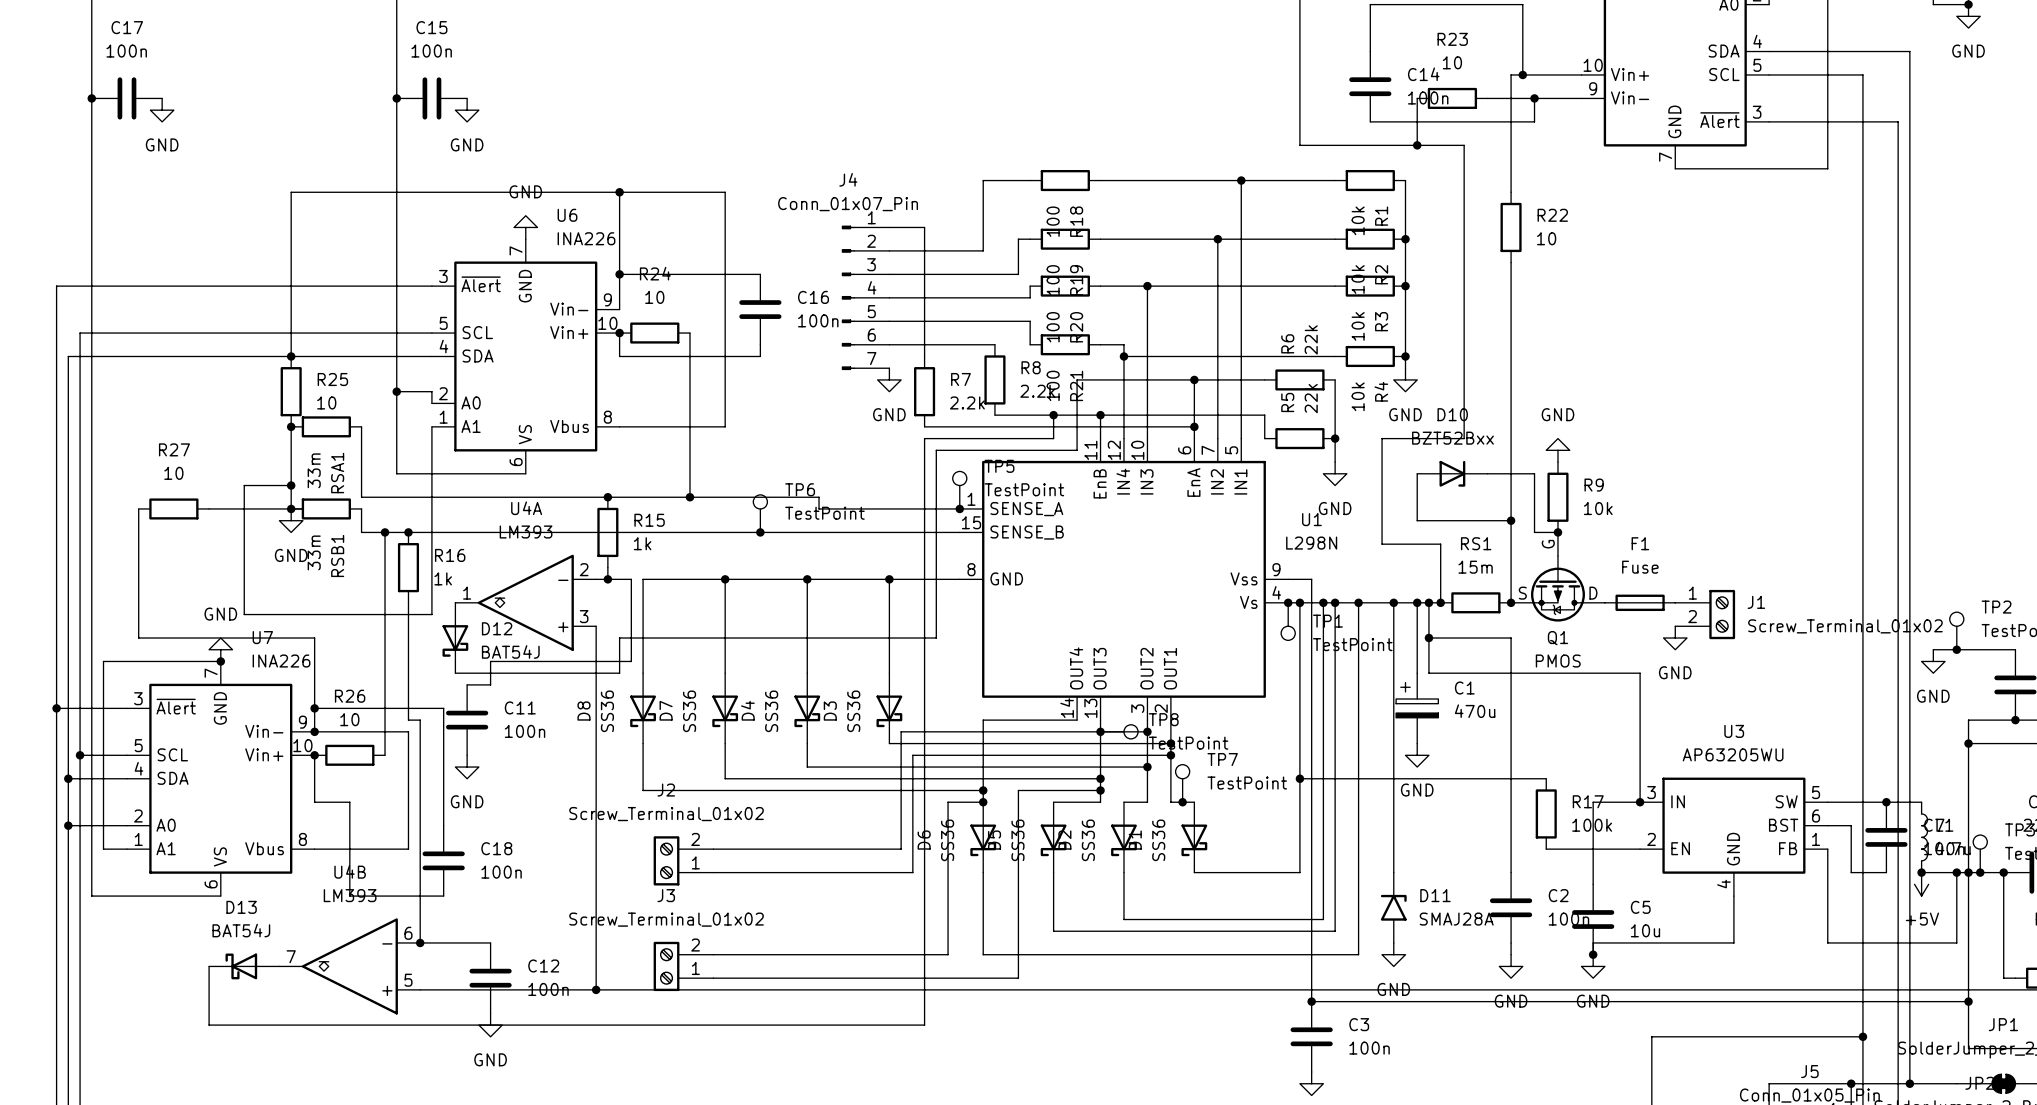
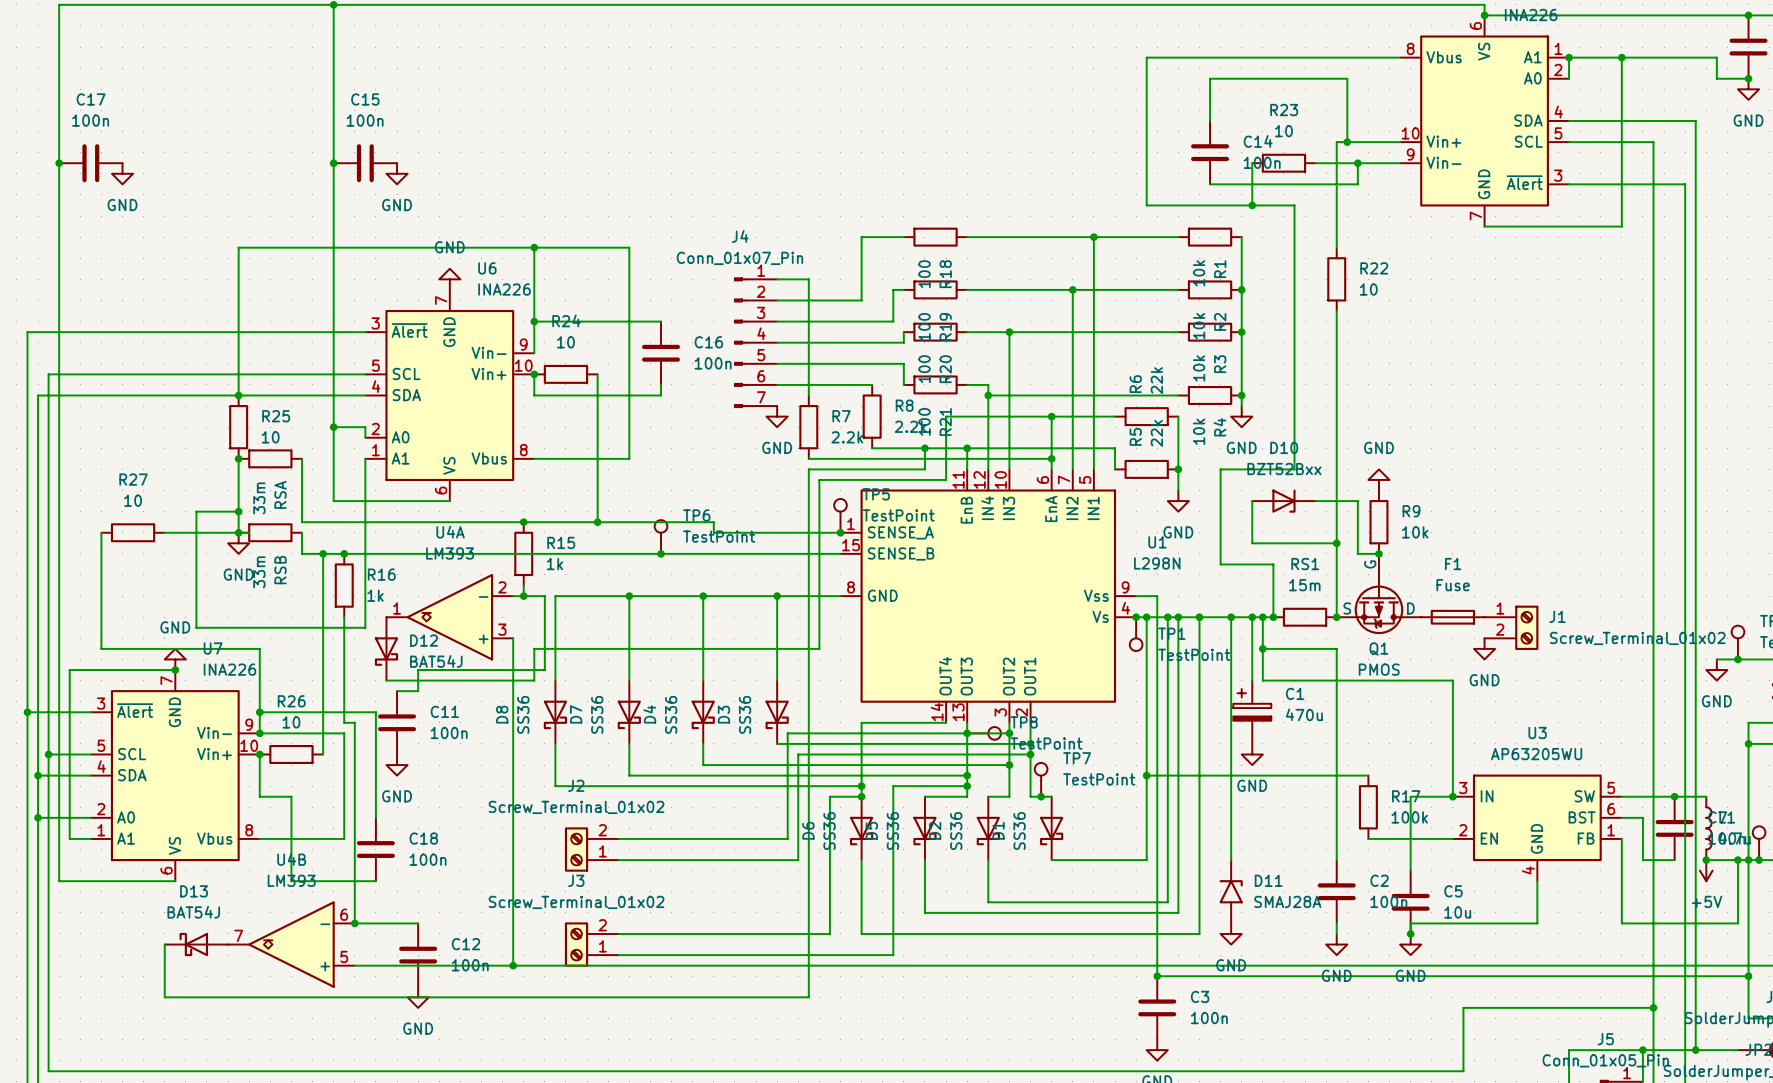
RSA1 name: RSA1 (337, 473) -> RSA (280, 494)
RSB1 name: RSB1 (337, 555) -> RSB (280, 570)

